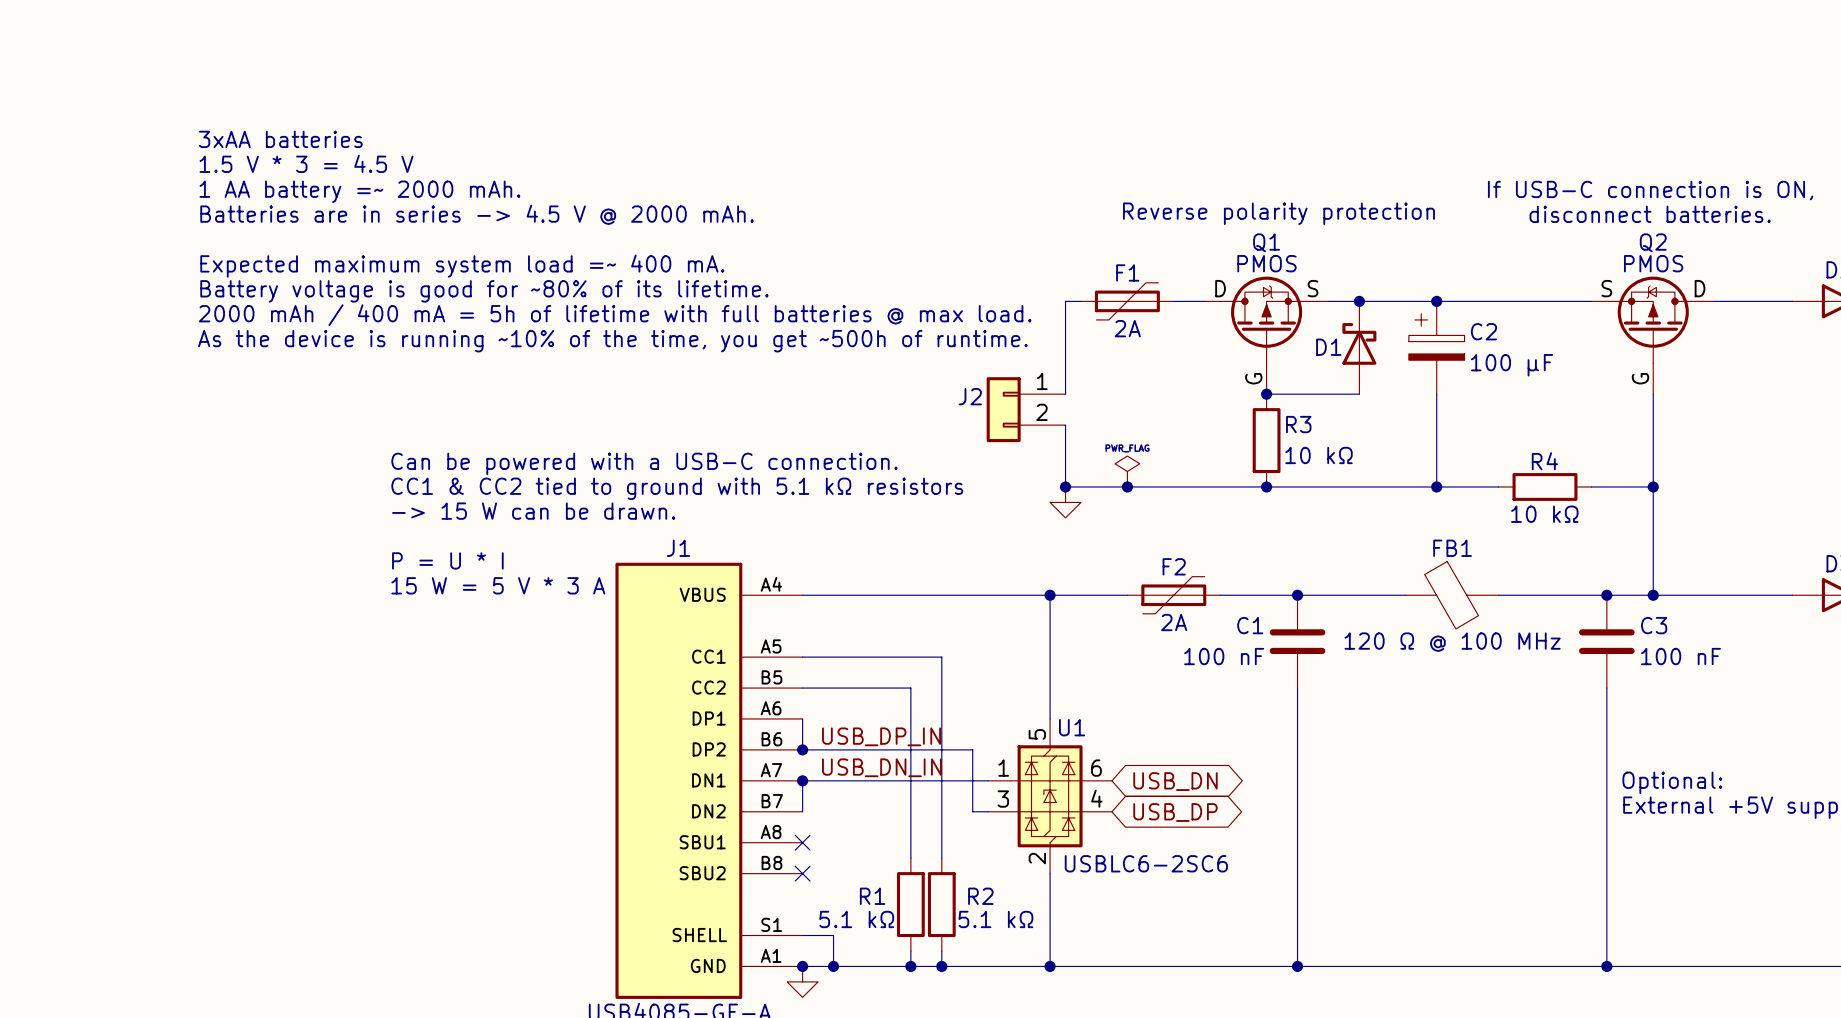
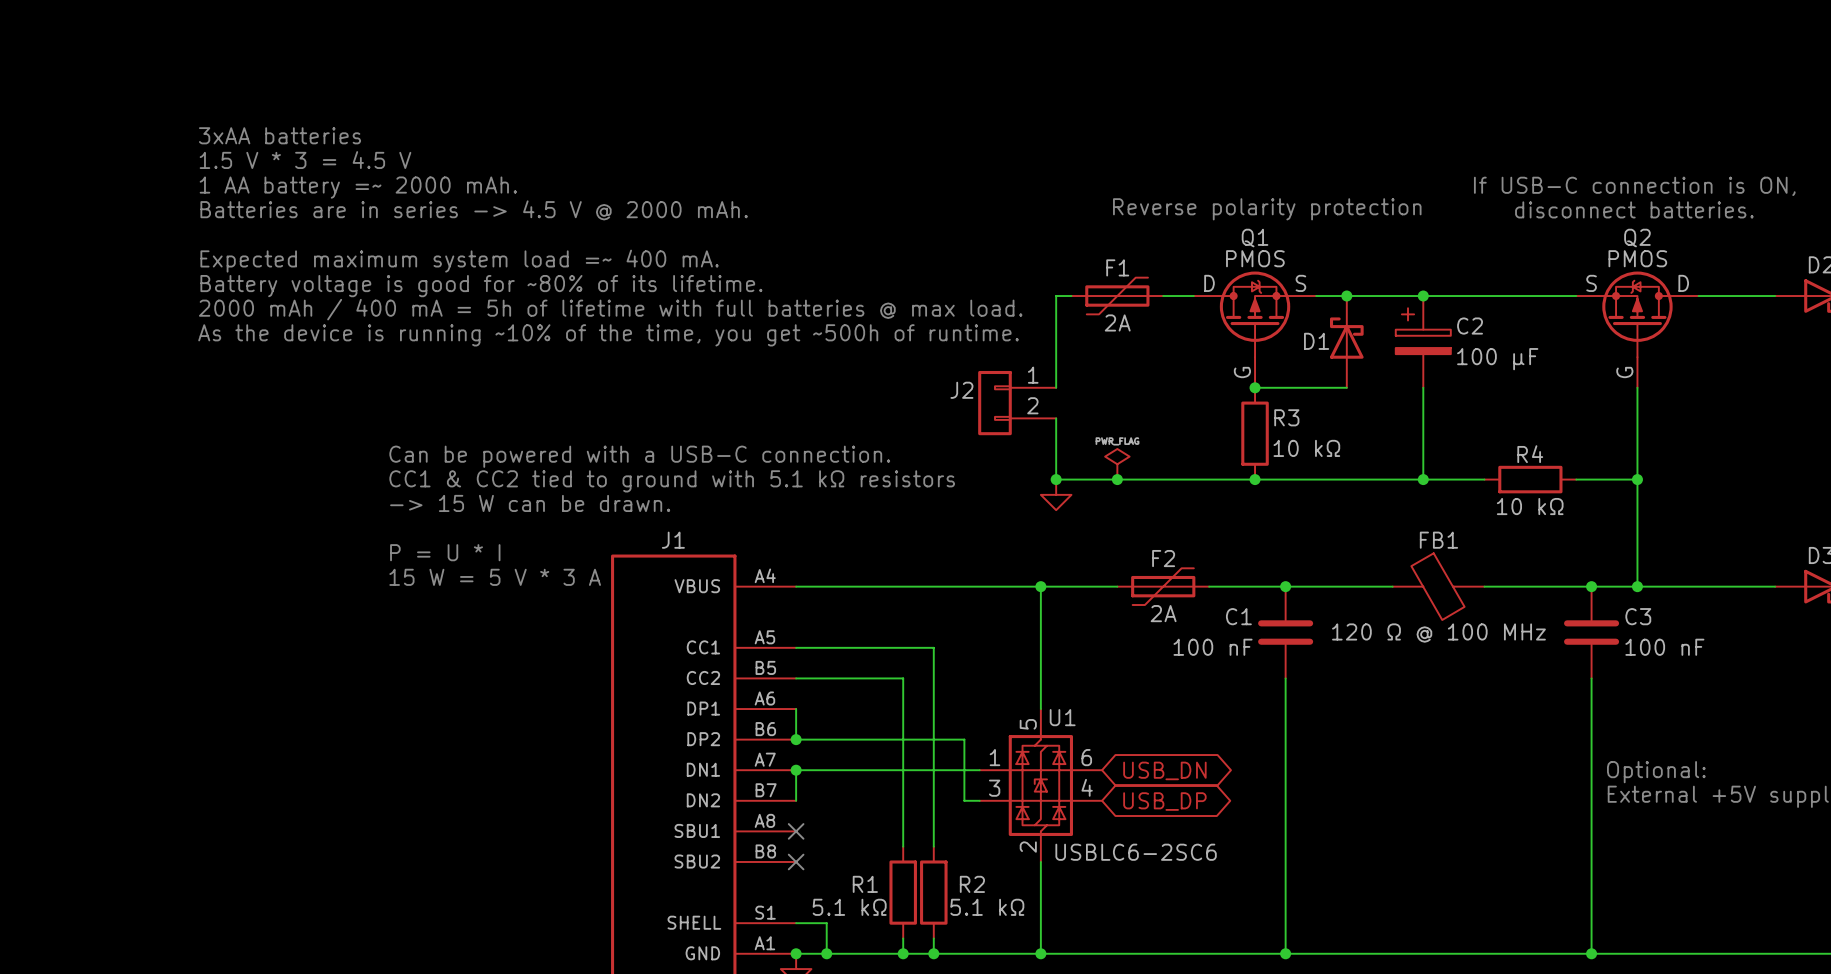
label: USB_DP_IN (881, 736) -> none
label: USB_DN_IN (881, 767) -> none

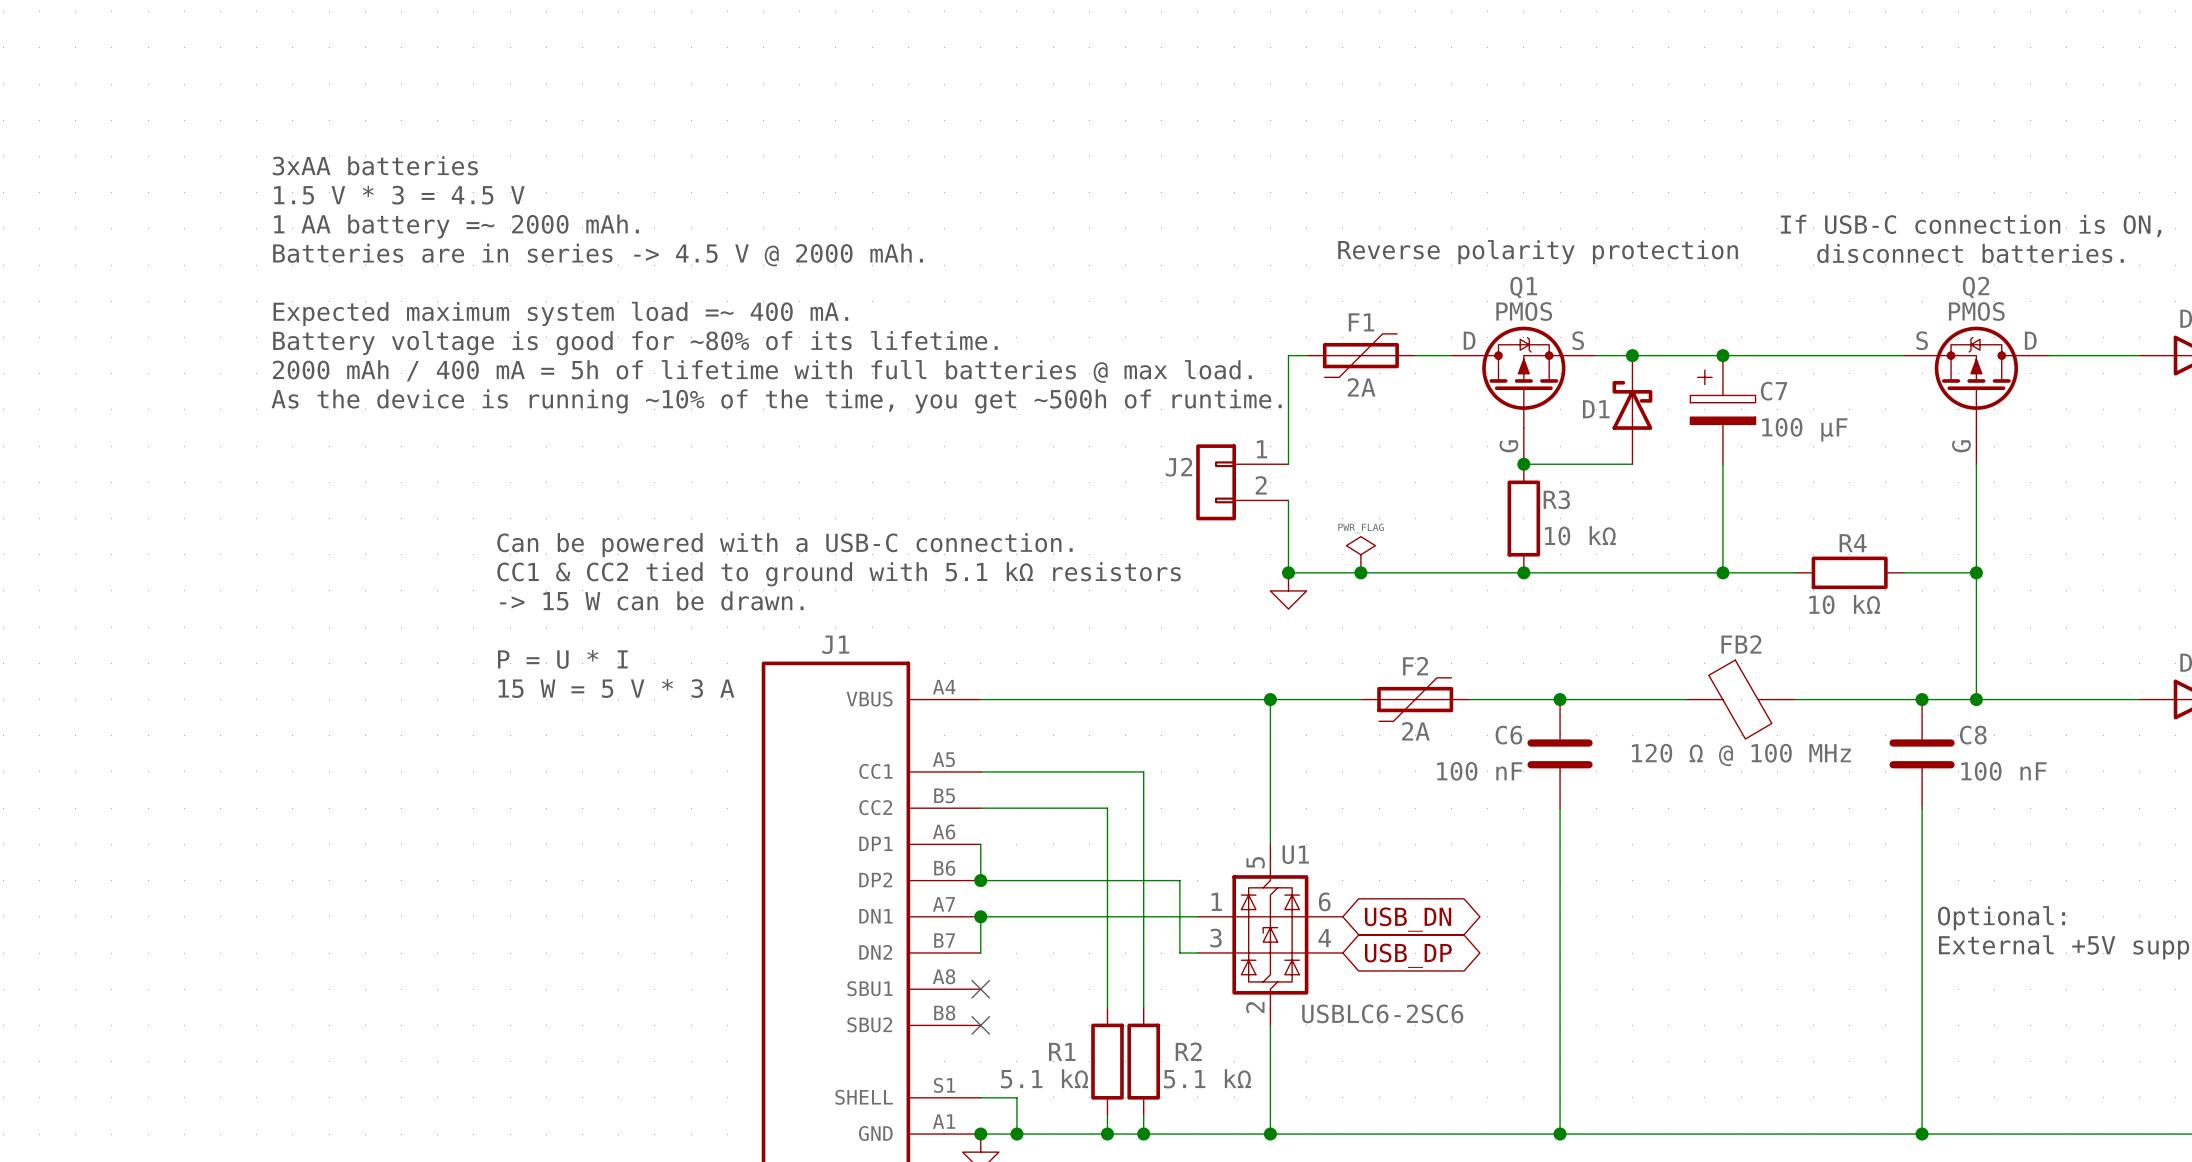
C2 name: C2 (1470, 326) -> C7 (1774, 391)
FB1 name: FB1 (1438, 540) -> FB2 (1741, 644)
C1 name: C1 (1238, 616) -> C6 (1508, 735)
C3 name: C3 (1638, 616) -> C8 (1973, 735)

